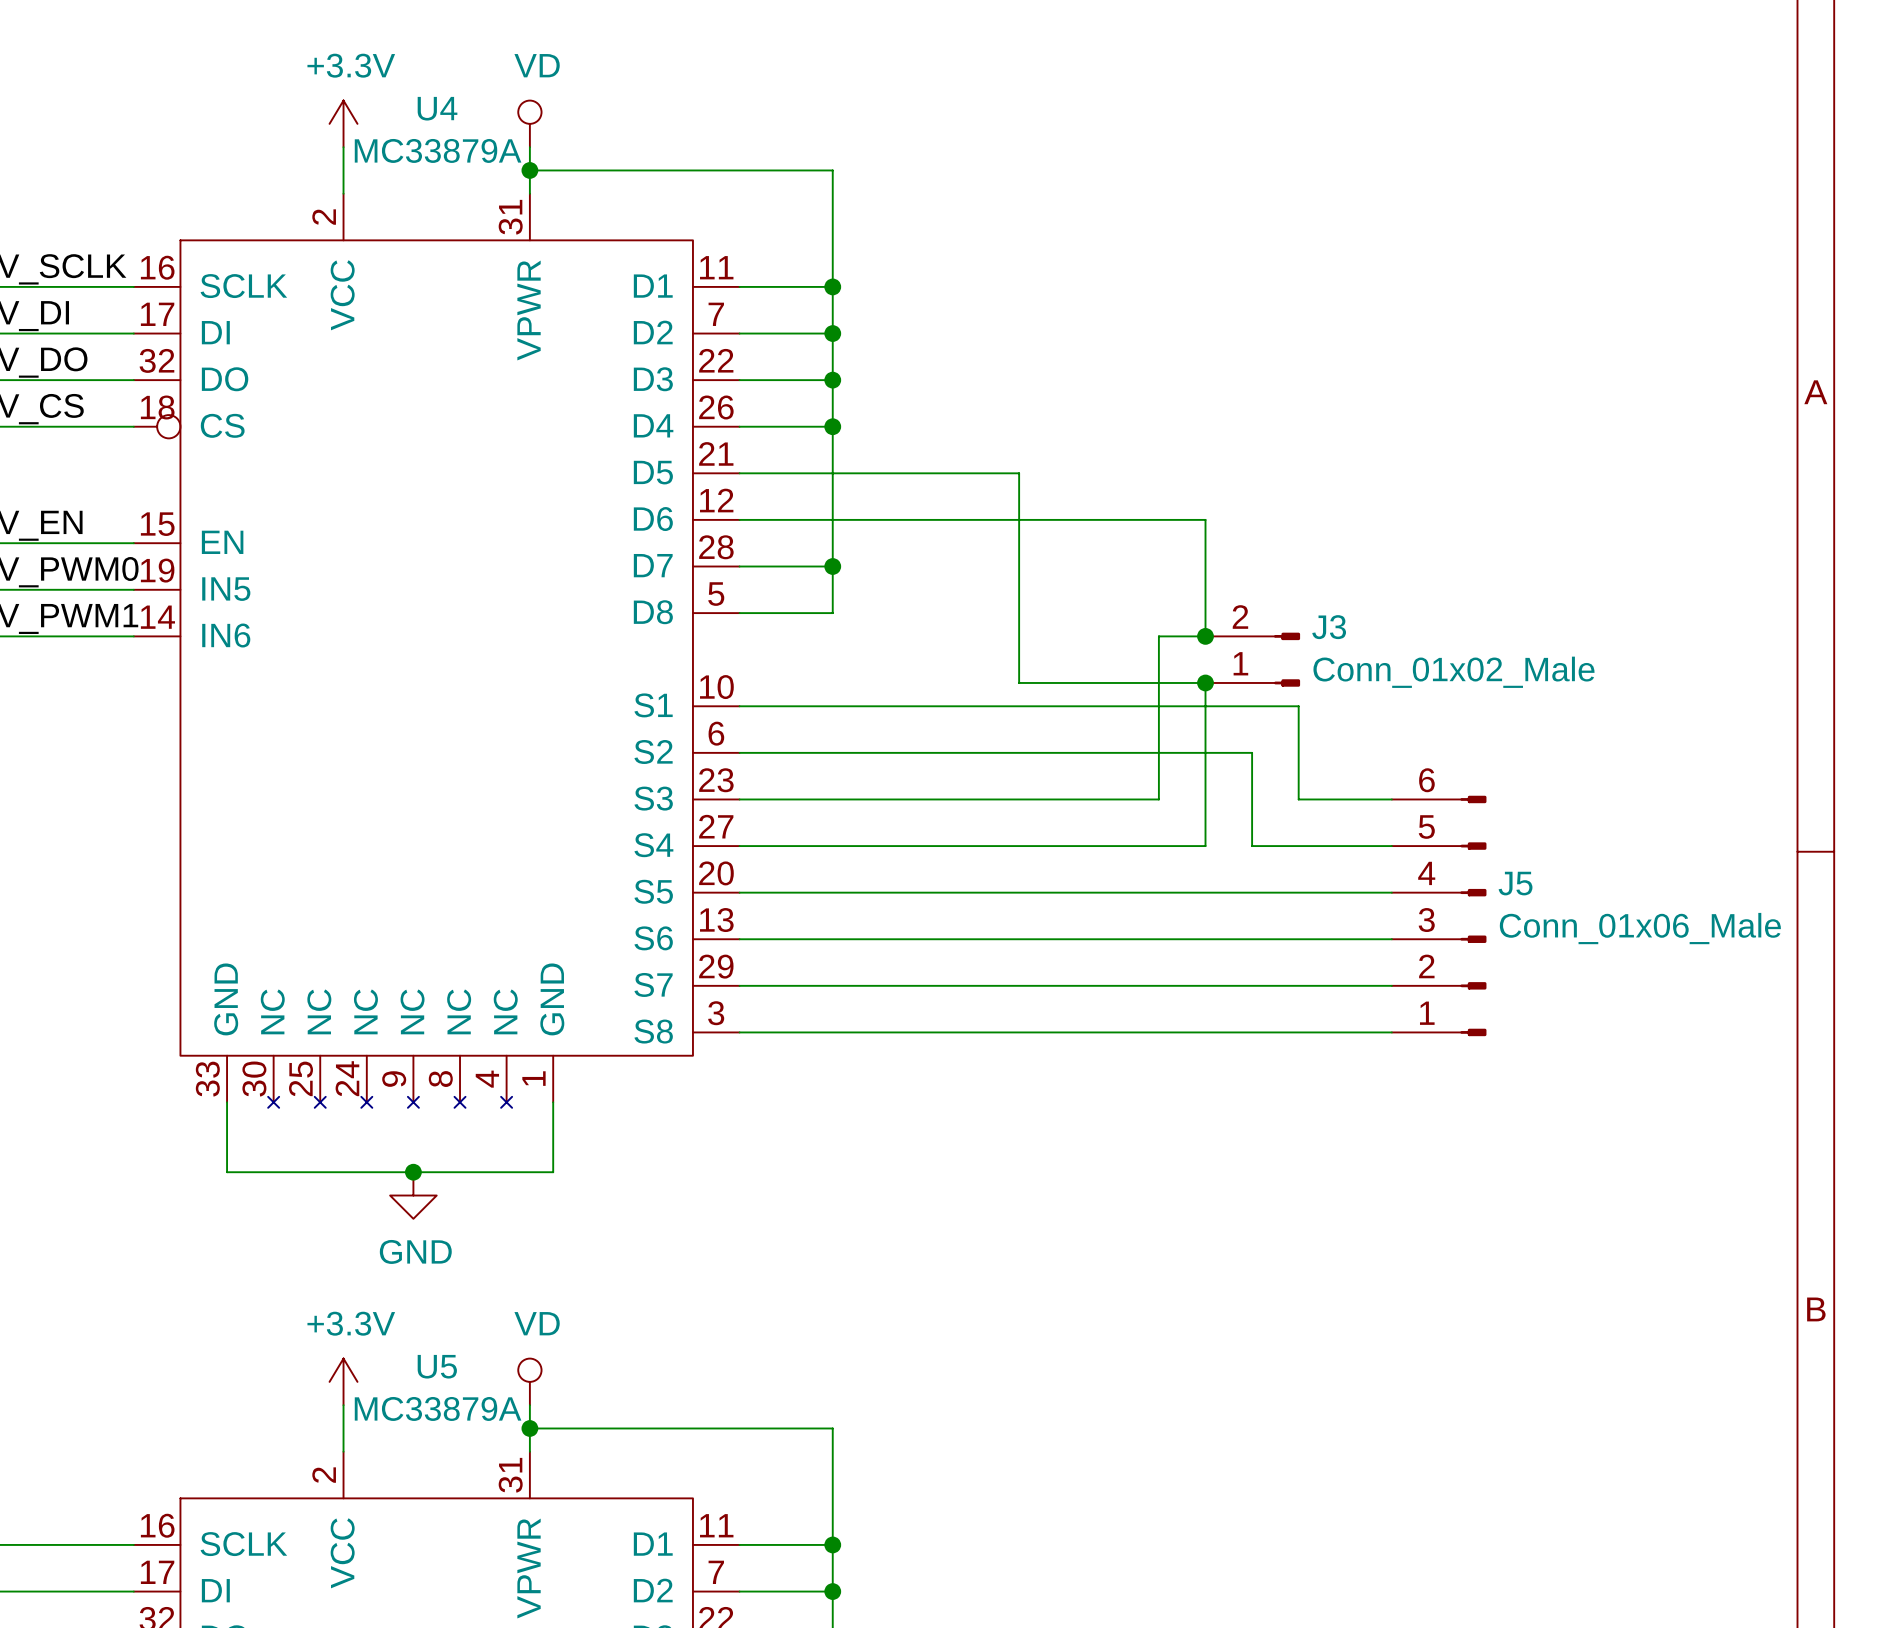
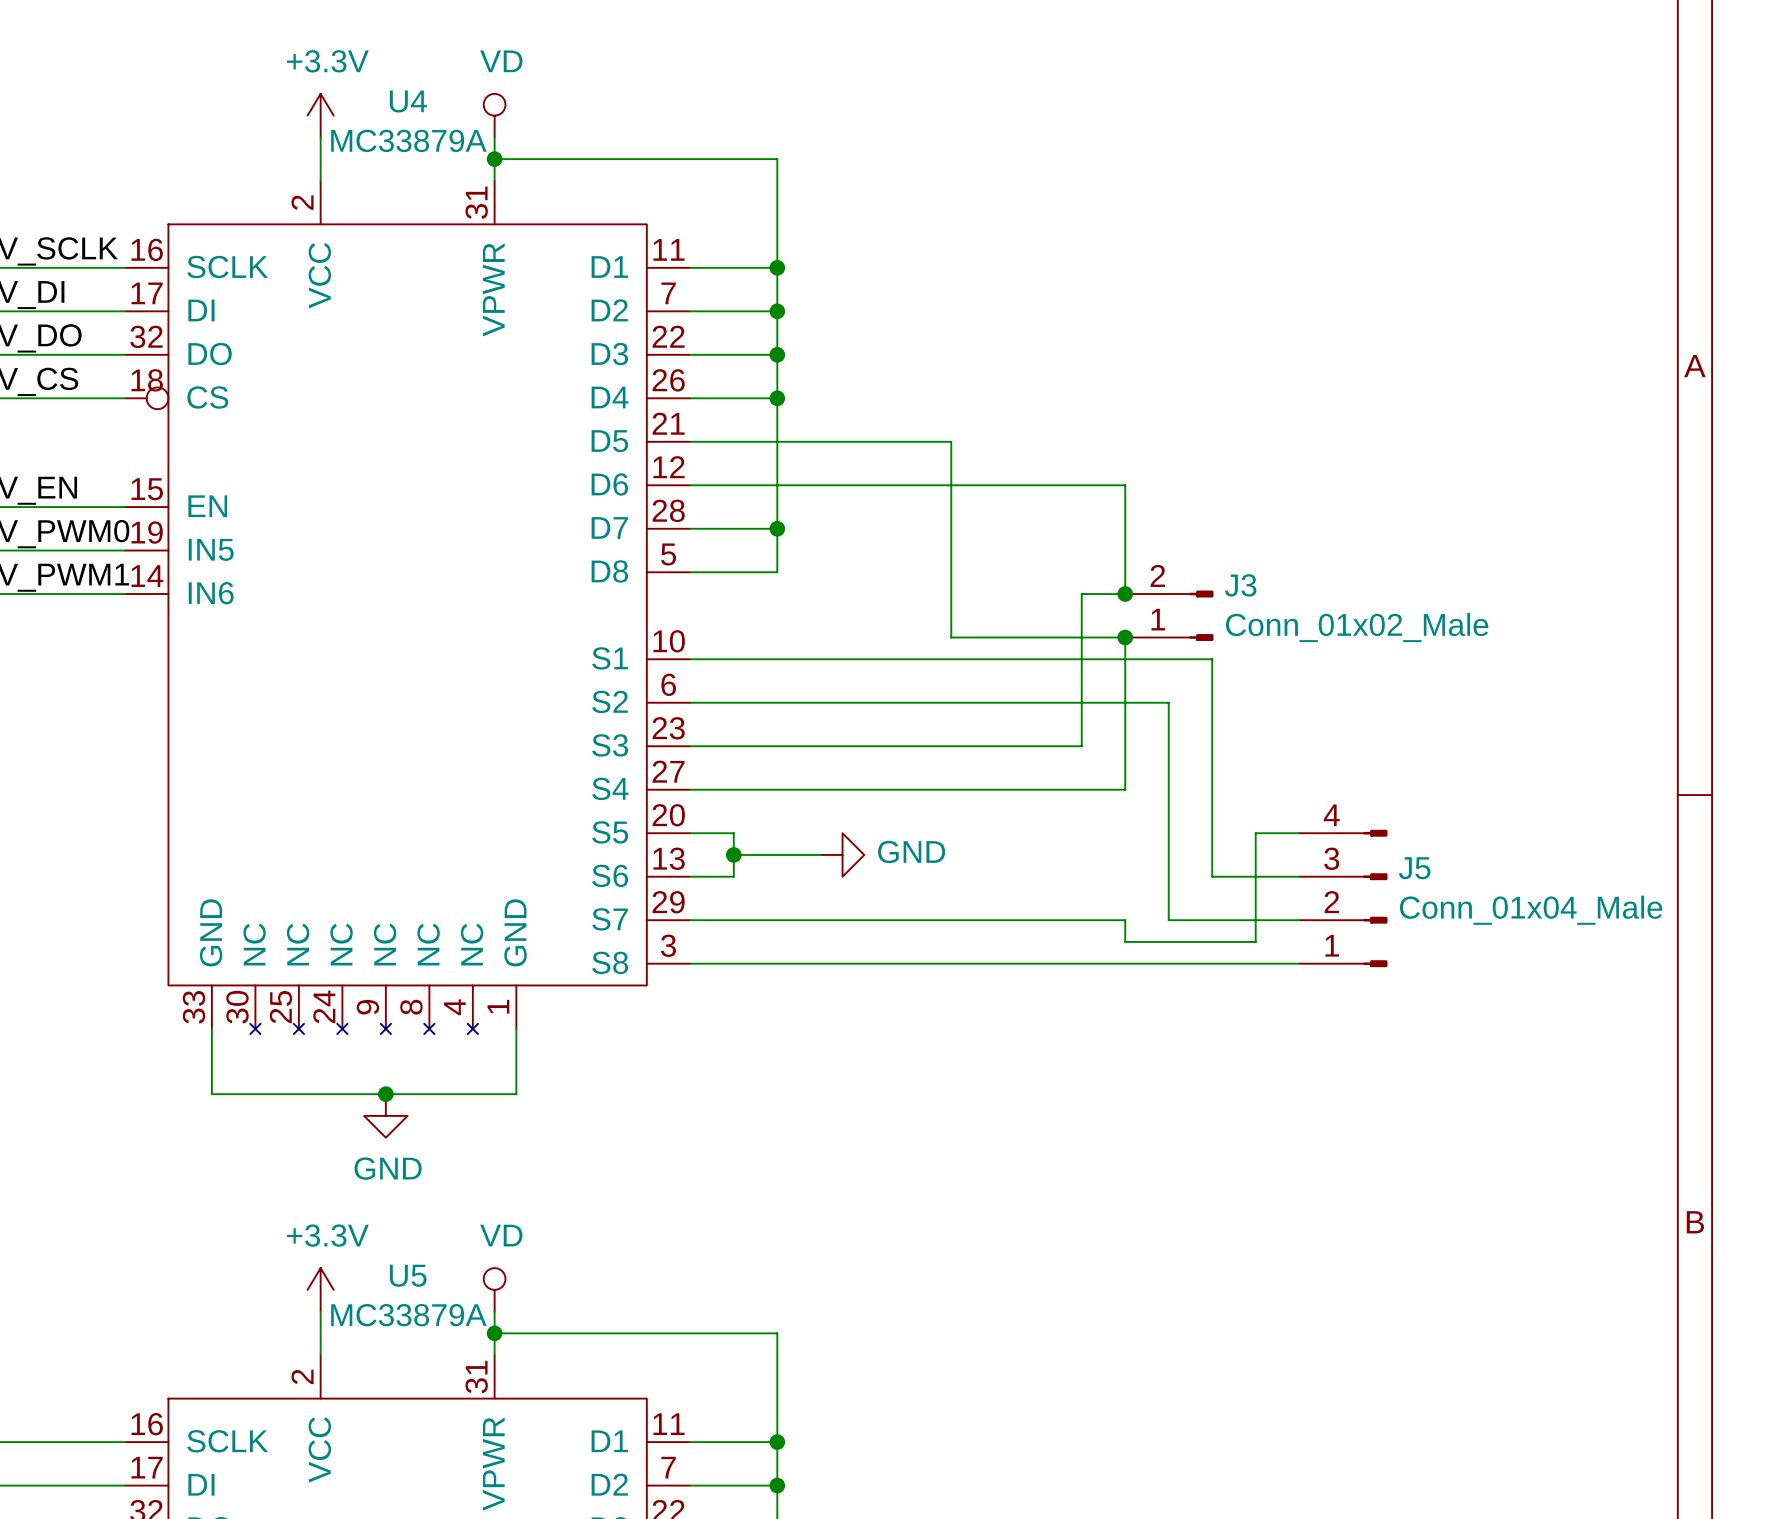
J5 symbol: [1391, 795, 1487, 1037] -> [1299, 829, 1388, 968]
wire: (1298, 799) (1391, 799) -> (1212, 746) (1212, 876)
wire: (1252, 846) (1391, 846) -> (1168, 789) (1168, 920)
wire: (786, 892) (1345, 892) -> none
wire: none -> (733, 854) (820, 854)
junction: none -> (733, 854)
power symbol: none -> GND (842, 854)
J5 value: Conn_01x06_Male (1640, 928) -> Conn_01x04_Male (1531, 910)
wire: (786, 939) (1298, 939) -> (733, 876) (733, 833)
wire: (1205, 985) (1252, 985) -> (1125, 920) (1125, 941) (1255, 941) (1255, 833)

